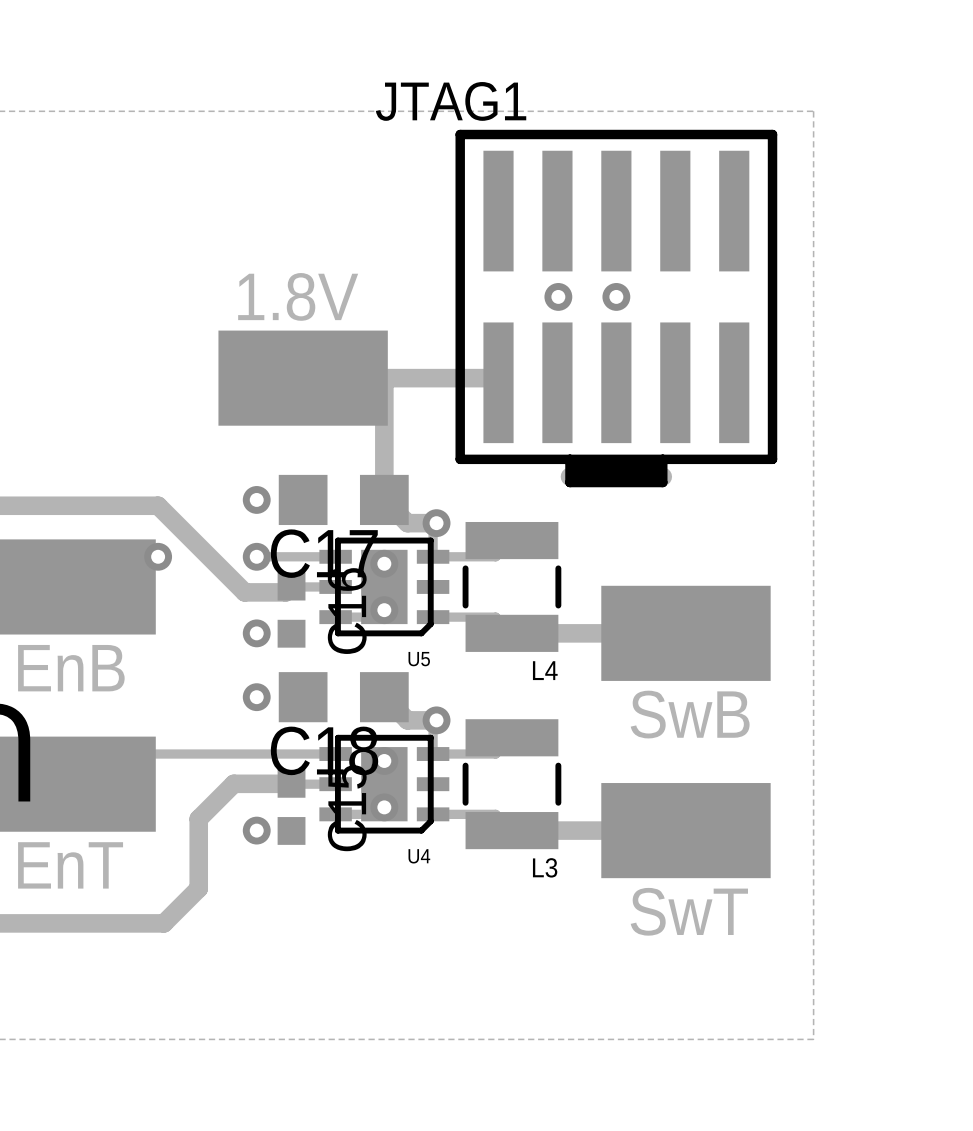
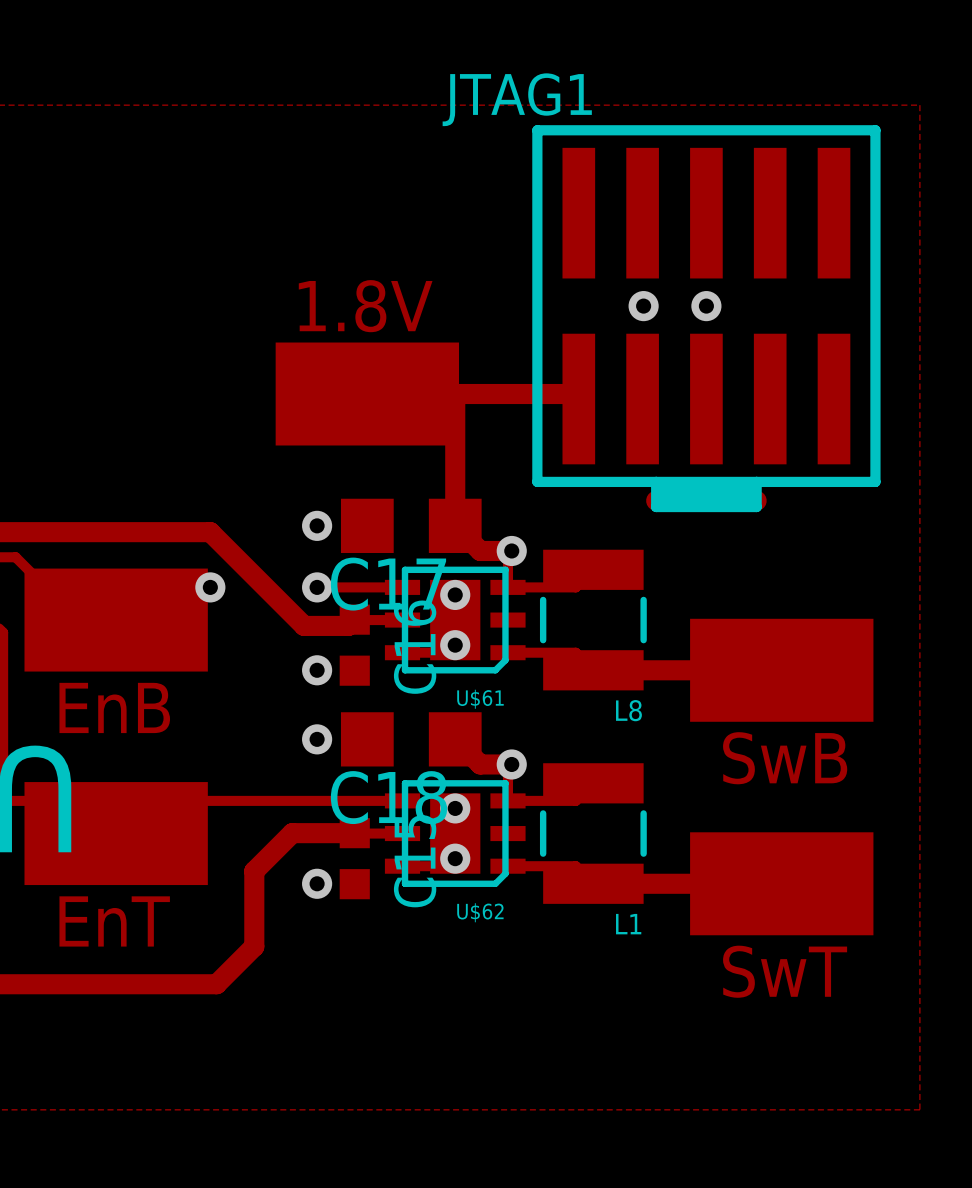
U5 name: U5 (419, 659) -> U$61 (480, 699)
L4 name: L4 (545, 670) -> L8 (628, 710)
U4 name: U4 (419, 856) -> U$62 (480, 912)
L3 name: L3 (545, 867) -> L1 (628, 924)

